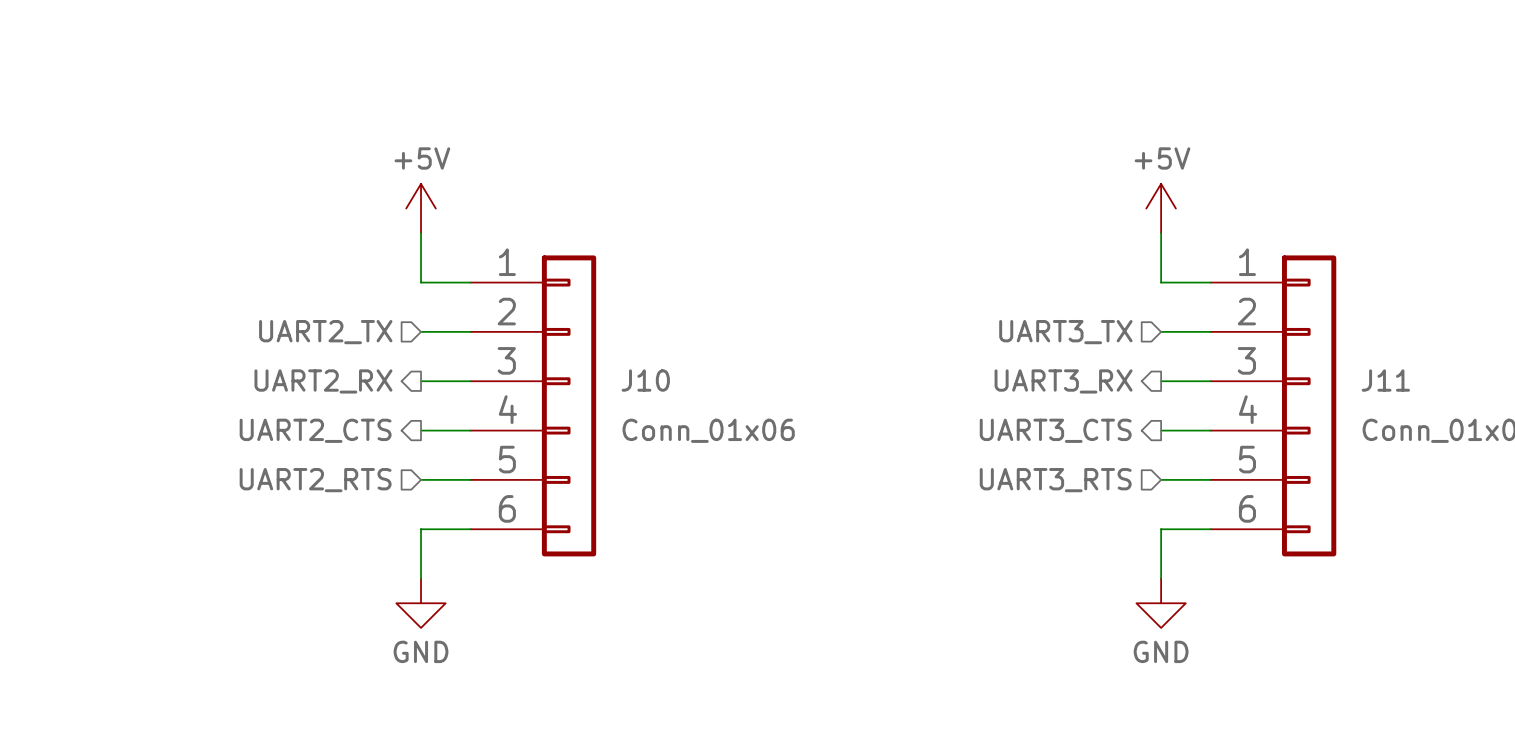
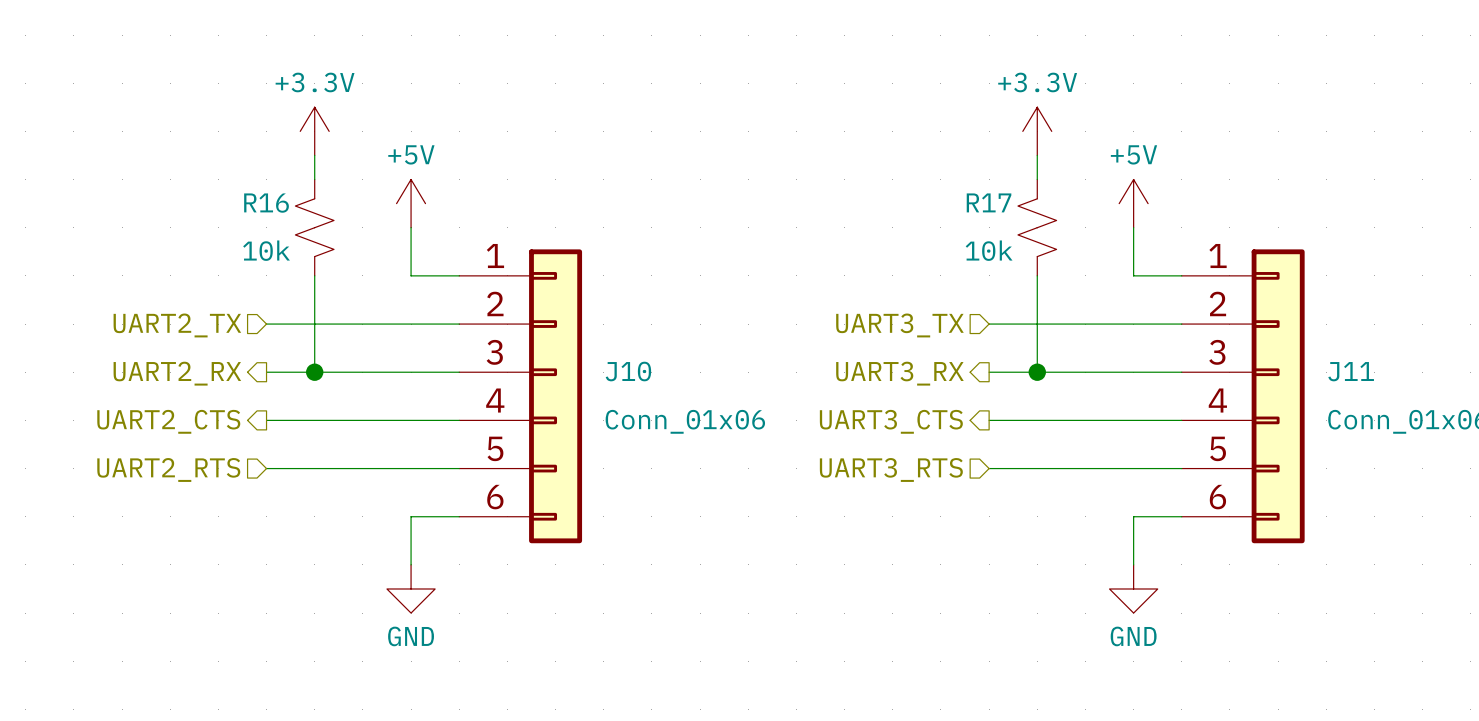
power symbol: none -> +3.3V (314, 131)
power symbol: none -> +3.3V (1037, 131)
wire: none -> (314, 155) (314, 179)
wire: none -> (1037, 155) (1037, 179)
R16: none -> 10k (314, 227)
R17: none -> 10k (1037, 227)
wire: none -> (314, 275) (314, 372)
wire: none -> (1037, 275) (1037, 372)
wire: none -> (266, 324) (411, 324)
wire: none -> (989, 324) (1133, 324)
hierarchical label position: UART2_TX (325, 332) -> UART2_TX (177, 325)
hierarchical label position: UART3_TX (1065, 332) -> UART3_TX (899, 325)
wire: none -> (266, 372) (411, 372)
junction: none -> (314, 372)
hierarchical label position: UART2_RX (323, 381) -> UART2_RX (177, 373)
wire: none -> (989, 372) (1133, 372)
junction: none -> (1037, 372)
hierarchical label position: UART3_RX (1063, 381) -> UART3_RX (899, 373)
wire: none -> (266, 420) (411, 420)
hierarchical label position: UART2_CTS (315, 430) -> UART2_CTS (168, 421)
wire: none -> (989, 420) (1133, 420)
hierarchical label position: UART3_CTS (1055, 430) -> UART3_CTS (891, 421)
wire: none -> (266, 468) (411, 468)
wire: none -> (989, 468) (1133, 468)
hierarchical label position: UART2_RTS (315, 480) -> UART2_RTS (168, 469)
hierarchical label position: UART3_RTS (1055, 480) -> UART3_RTS (891, 469)

